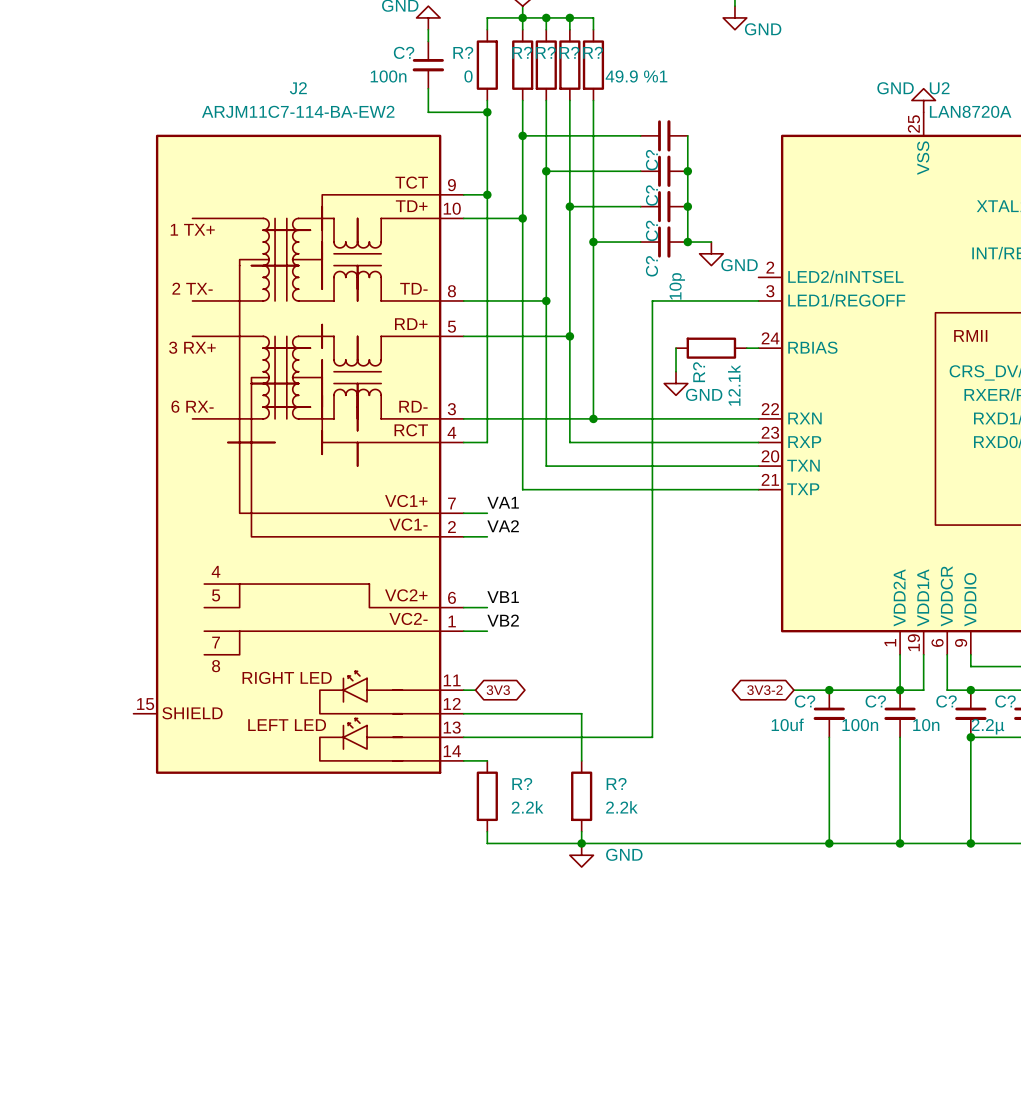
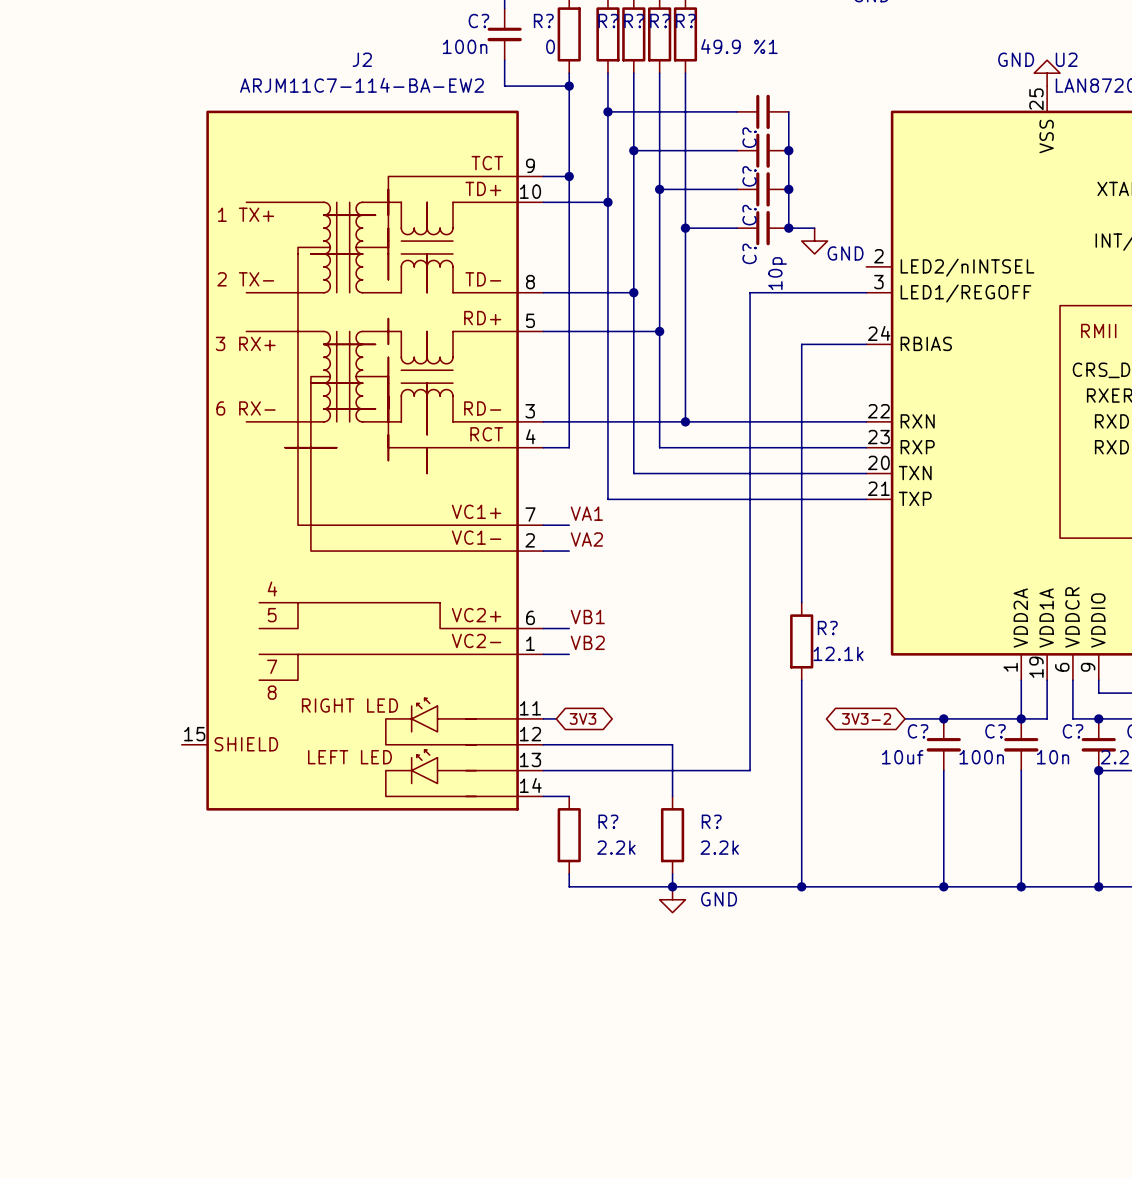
wire: (676, 348) (676, 371) -> none
R?: 12.1k (711, 348) -> none
wire: none -> (853, 344) (801, 344) (801, 602)
power symbol: GND (676, 383) -> none
R?: none -> 12.1k (801, 641)
wire: none -> (801, 680) (801, 886)
junction: none -> (801, 886)

